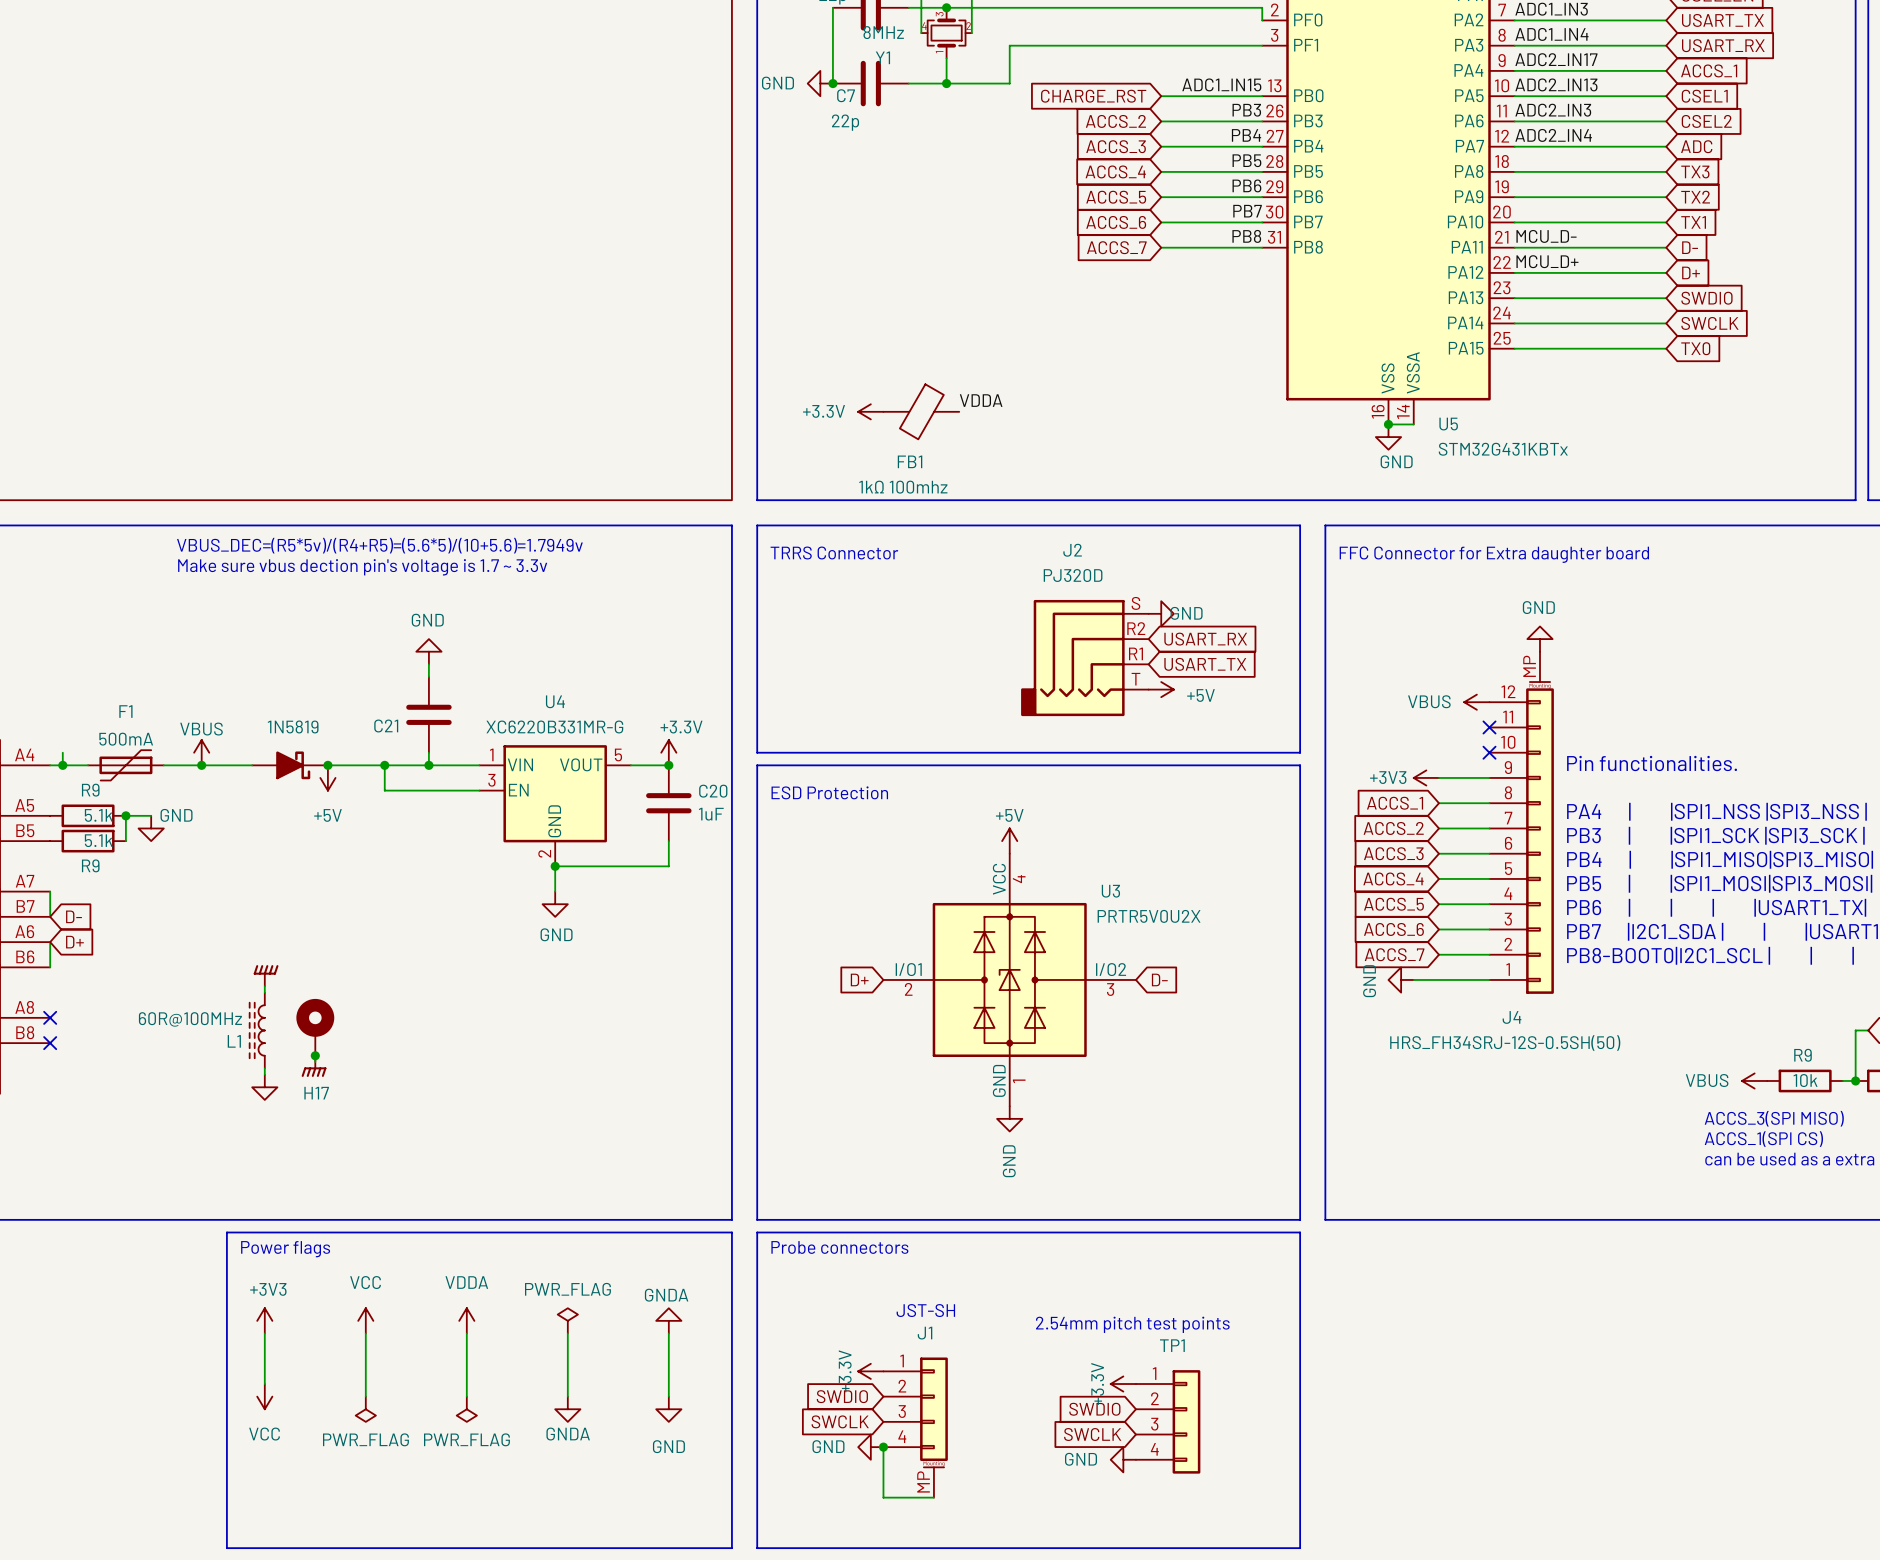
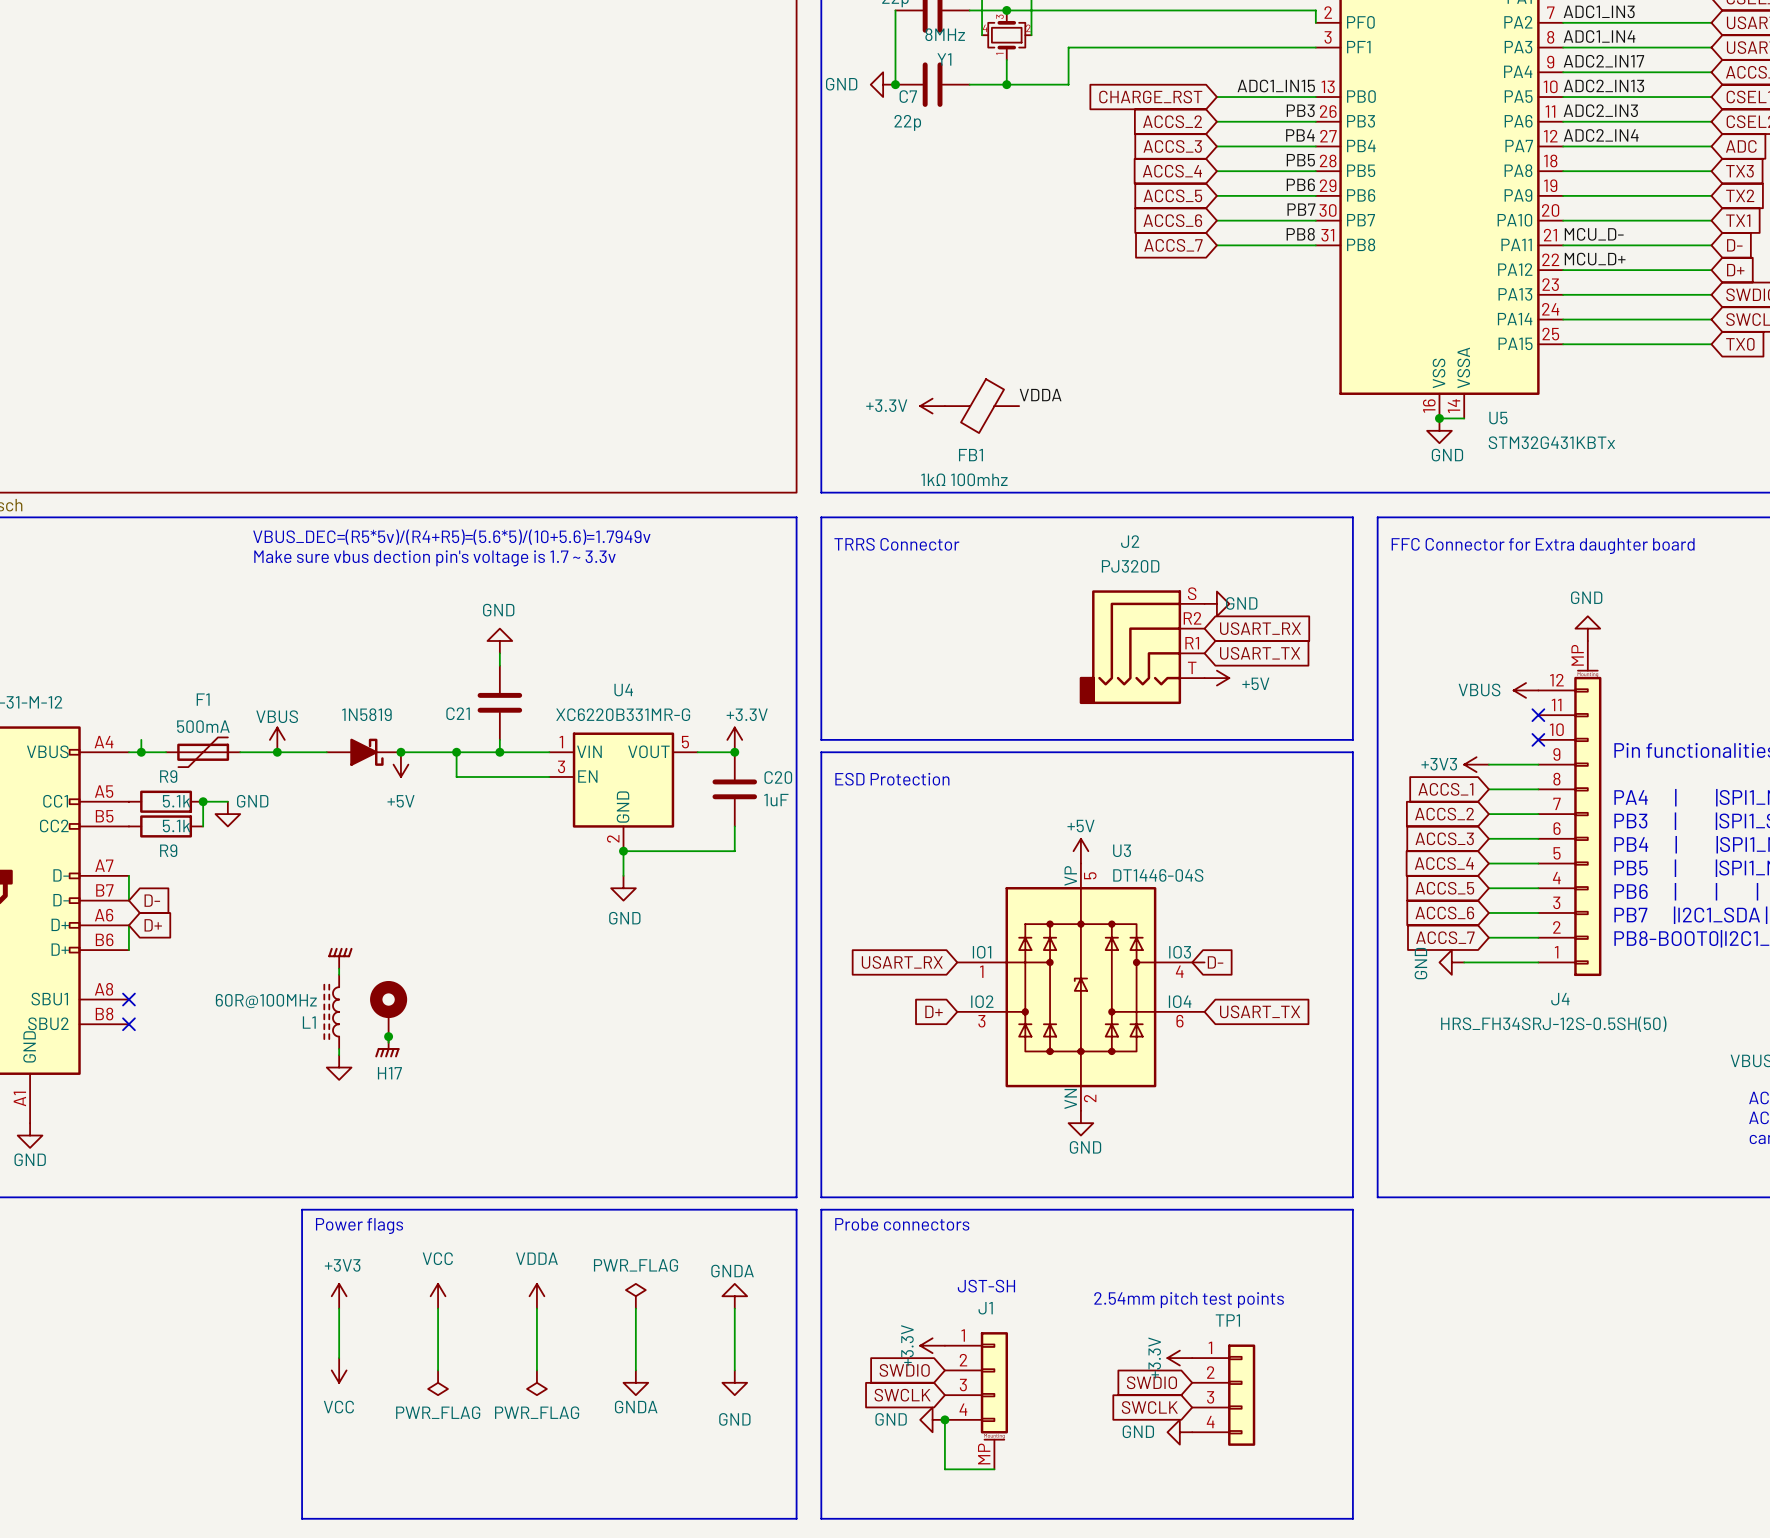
power symbol position: +5V (1009, 841) -> +5V (1080, 851)
U3 symbol: [883, 853, 1136, 1107] -> [957, 863, 1205, 1111]
U3 name position: U3 (1110, 891) -> U3 (1122, 850)
U3 value: PRTR5V0U2X (1149, 916) -> DT1446-04S (1158, 875)
global label: none -> USART_RX (902, 962)
global label position: D+ (859, 979) -> D+ (934, 1011)
global label: none -> USART_TX (1260, 1011)
power symbol position: GND (1009, 1118) -> GND (1080, 1123)
power symbol text rotation: 0° (1009, 1161) -> 90° clockwise (1085, 1147)

